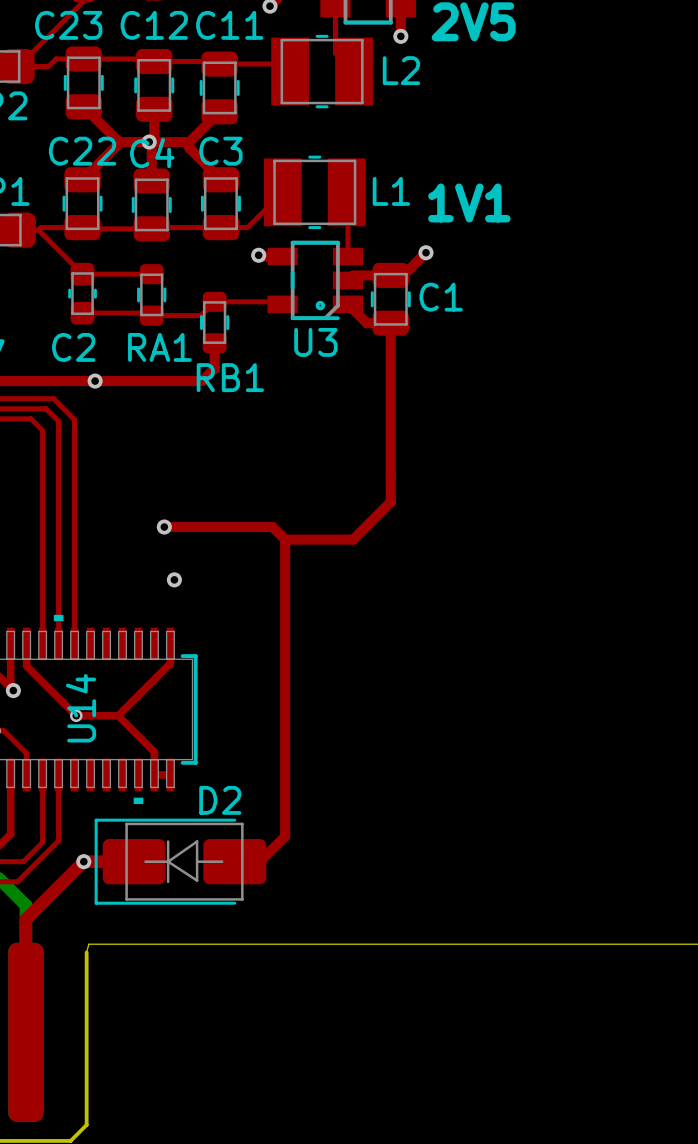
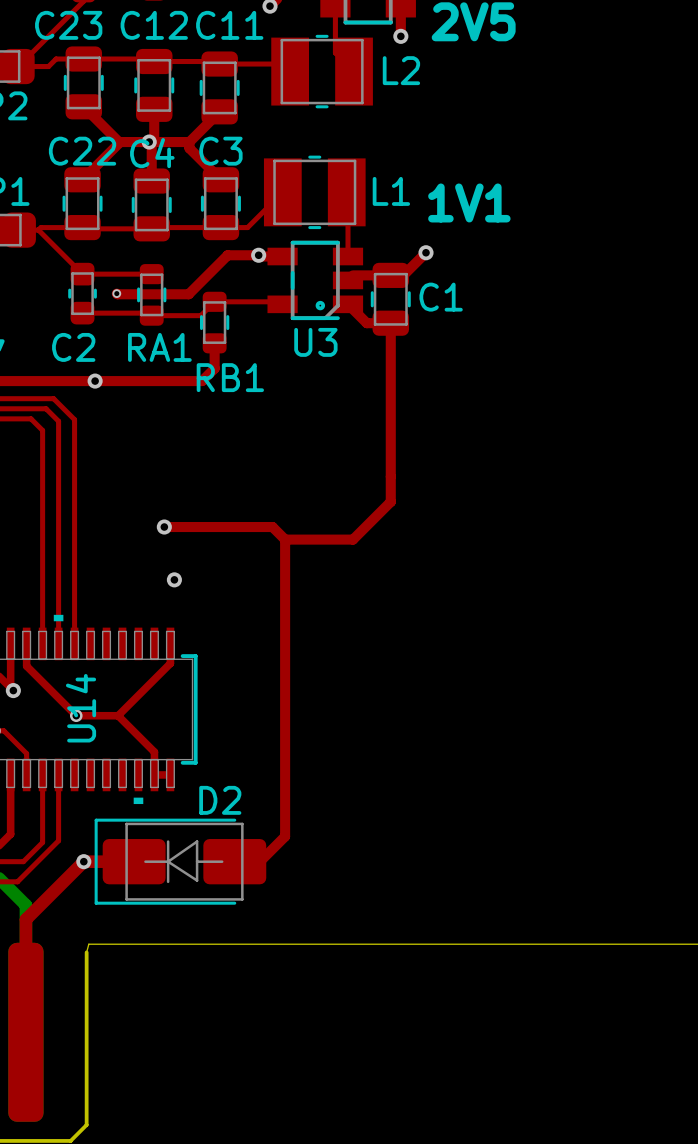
top track: none -> (258, 255) (227, 255) (188, 294) (116, 293)
via: none -> (116, 293)

